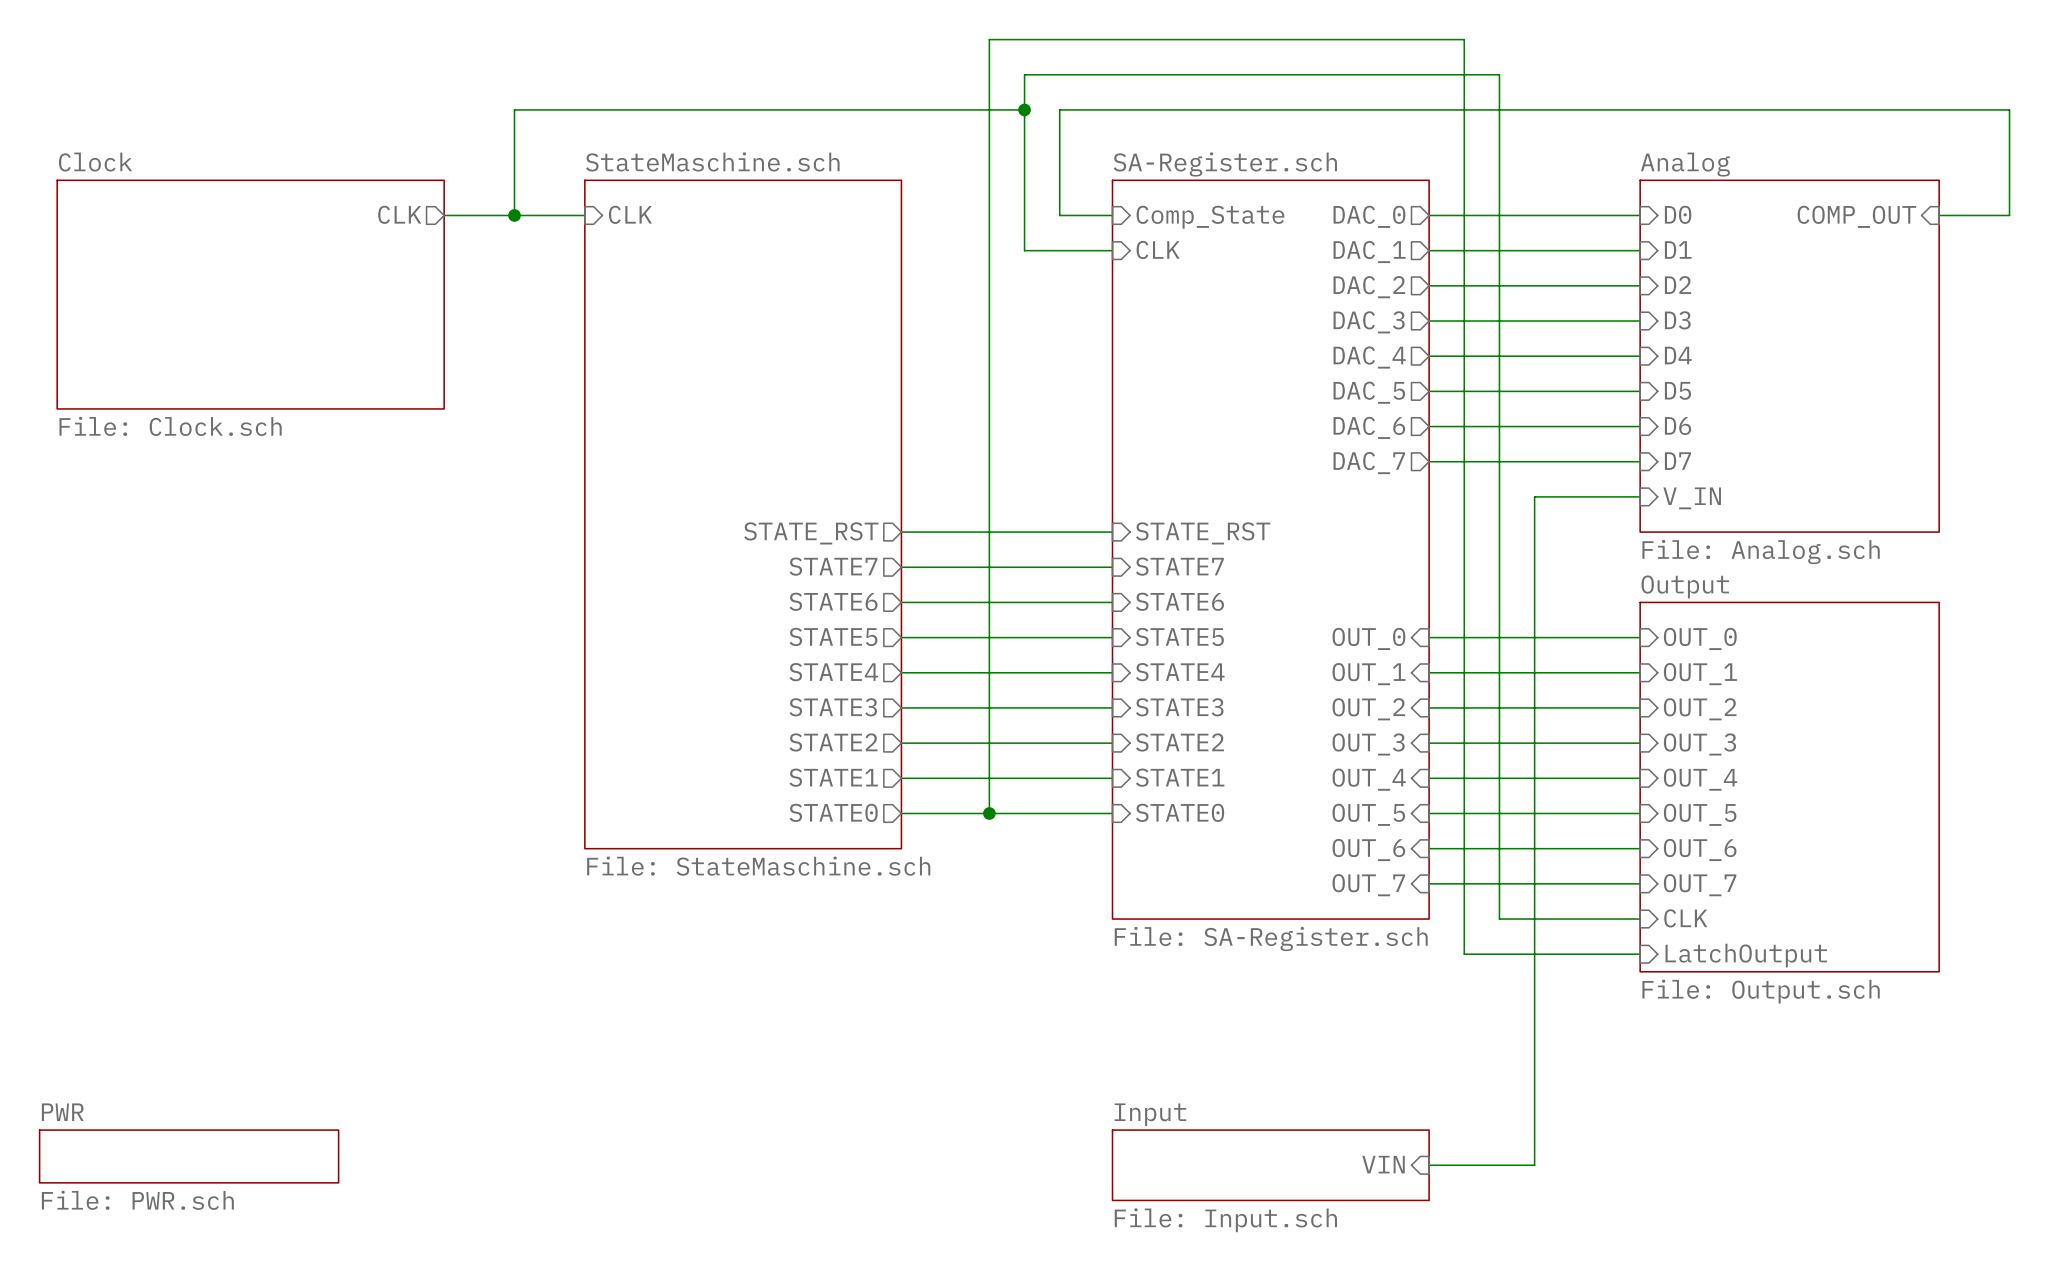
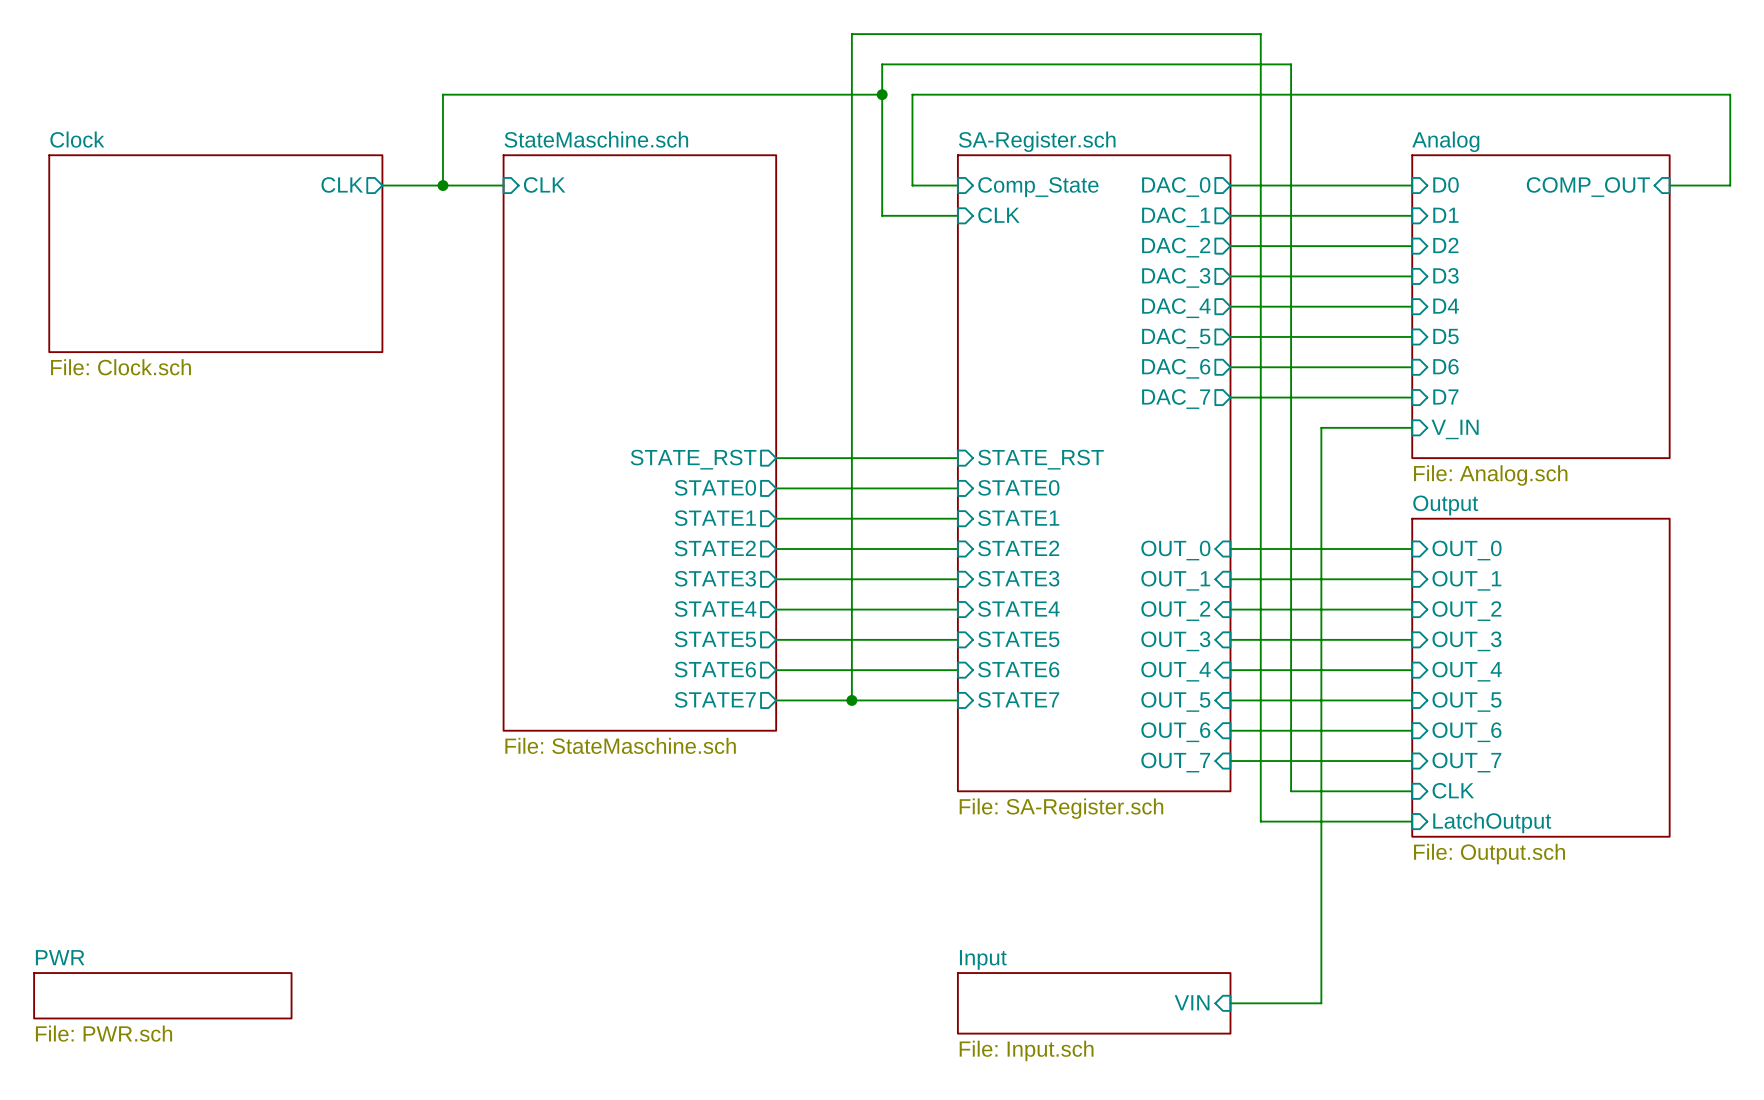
sheet pin: STATE7 (833, 566) -> STATE0 (715, 487)
sheet pin: STATE7 (1179, 566) -> STATE0 (1018, 487)
sheet pin: STATE6 (833, 601) -> STATE1 (715, 518)
sheet pin: STATE6 (1179, 601) -> STATE1 (1018, 518)
sheet pin: STATE5 (833, 636) -> STATE2 (715, 548)
sheet pin: STATE5 (1179, 636) -> STATE2 (1018, 548)
sheet pin: STATE4 (833, 672) -> STATE3 (715, 578)
sheet pin: STATE4 (1180, 672) -> STATE3 (1018, 578)
sheet pin: STATE3 (833, 707) -> STATE4 (715, 609)
sheet pin: STATE3 (1179, 707) -> STATE4 (1018, 609)
sheet pin: STATE2 (833, 742) -> STATE5 (715, 639)
sheet pin: STATE2 (1179, 742) -> STATE5 (1018, 639)
sheet pin: STATE1 (833, 777) -> STATE6 (715, 669)
sheet pin: STATE1 (1180, 777) -> STATE6 (1018, 669)
sheet pin: STATE0 (833, 812) -> STATE7 (715, 699)
sheet pin: STATE0 (1180, 812) -> STATE7 (1018, 699)

